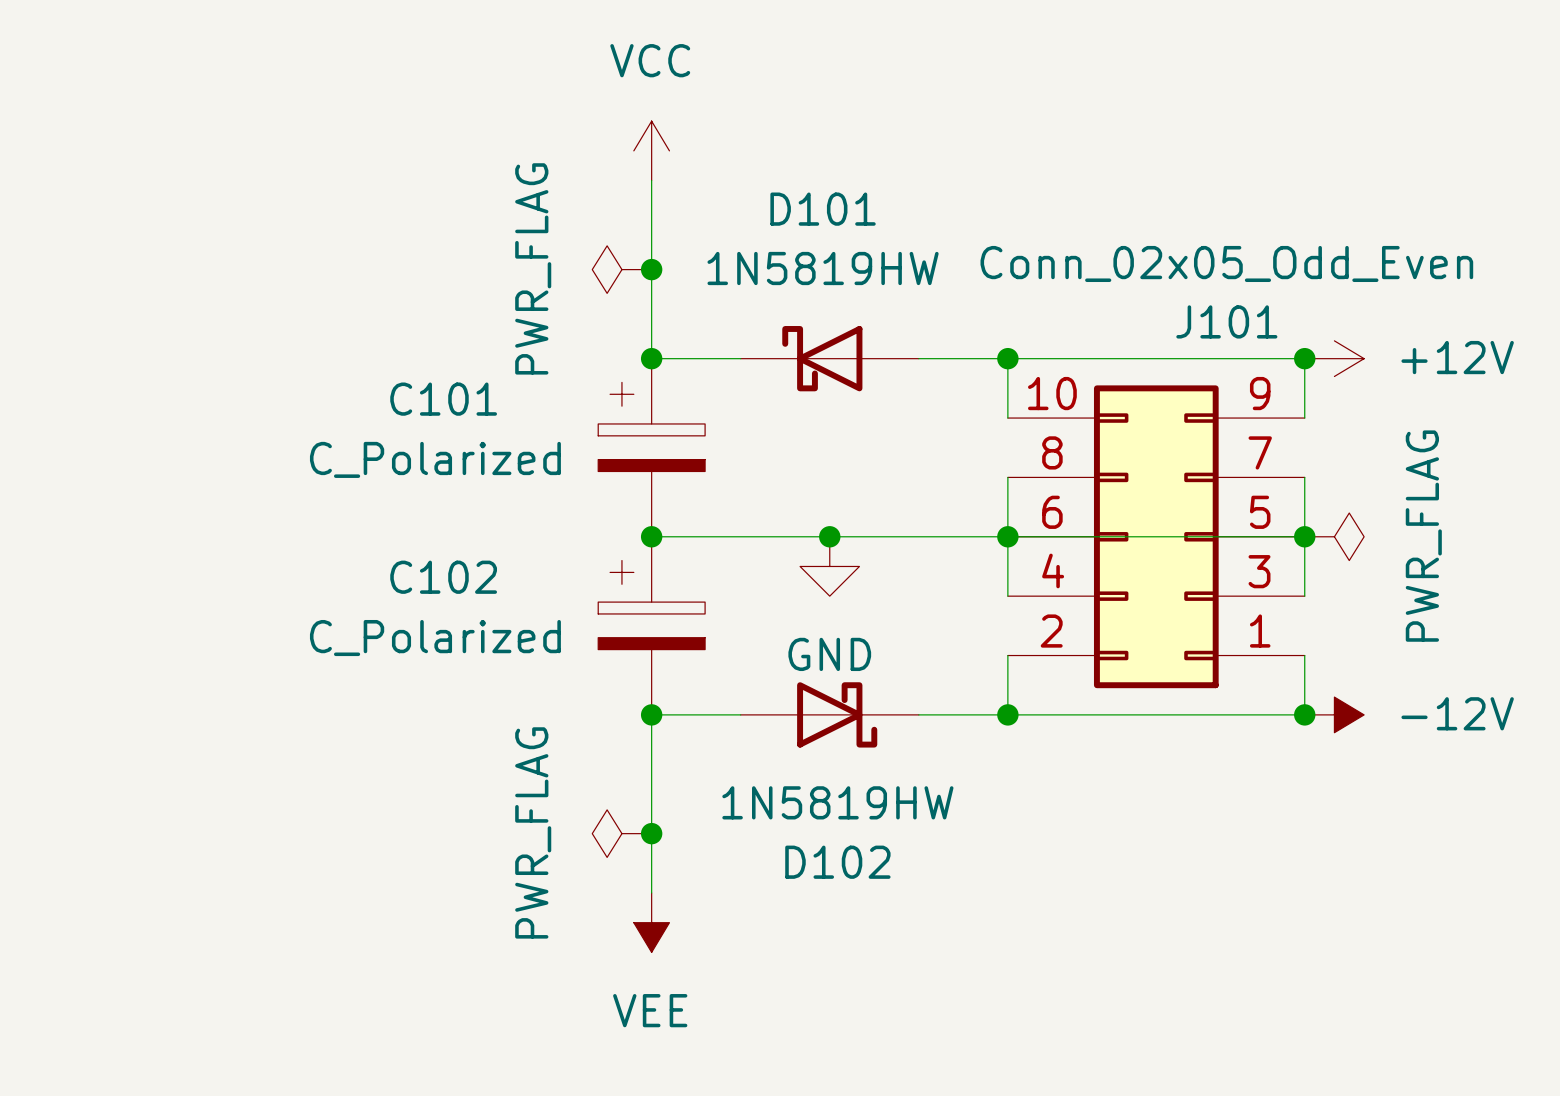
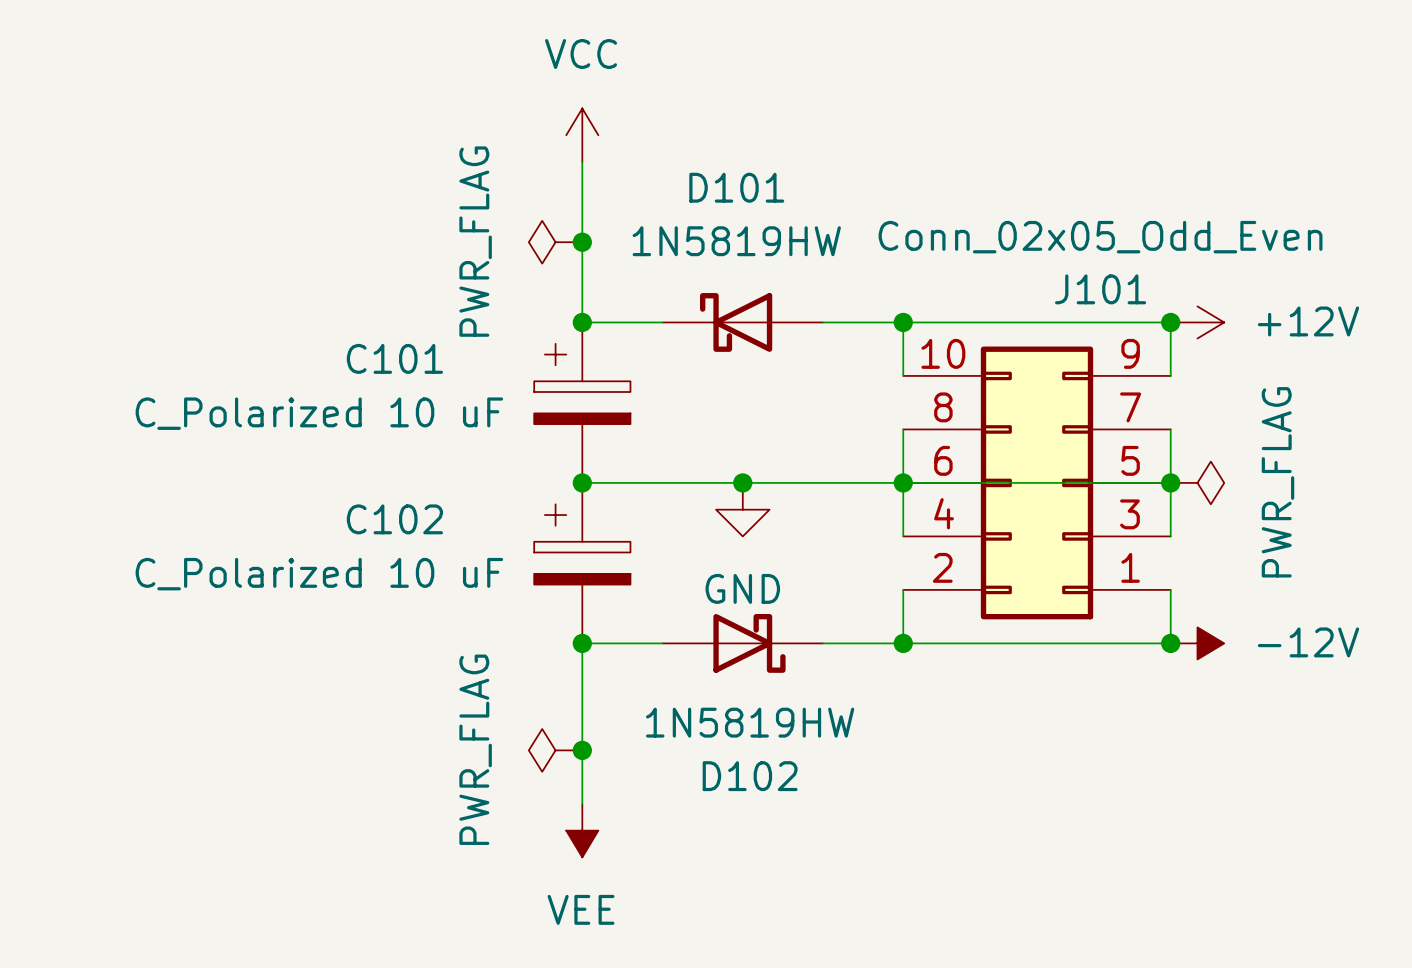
C101 value: C_Polarized (435, 459) -> C_Polarized 10 uF (319, 413)
C102 value: C_Polarized (435, 638) -> C_Polarized 10 uF (319, 574)

